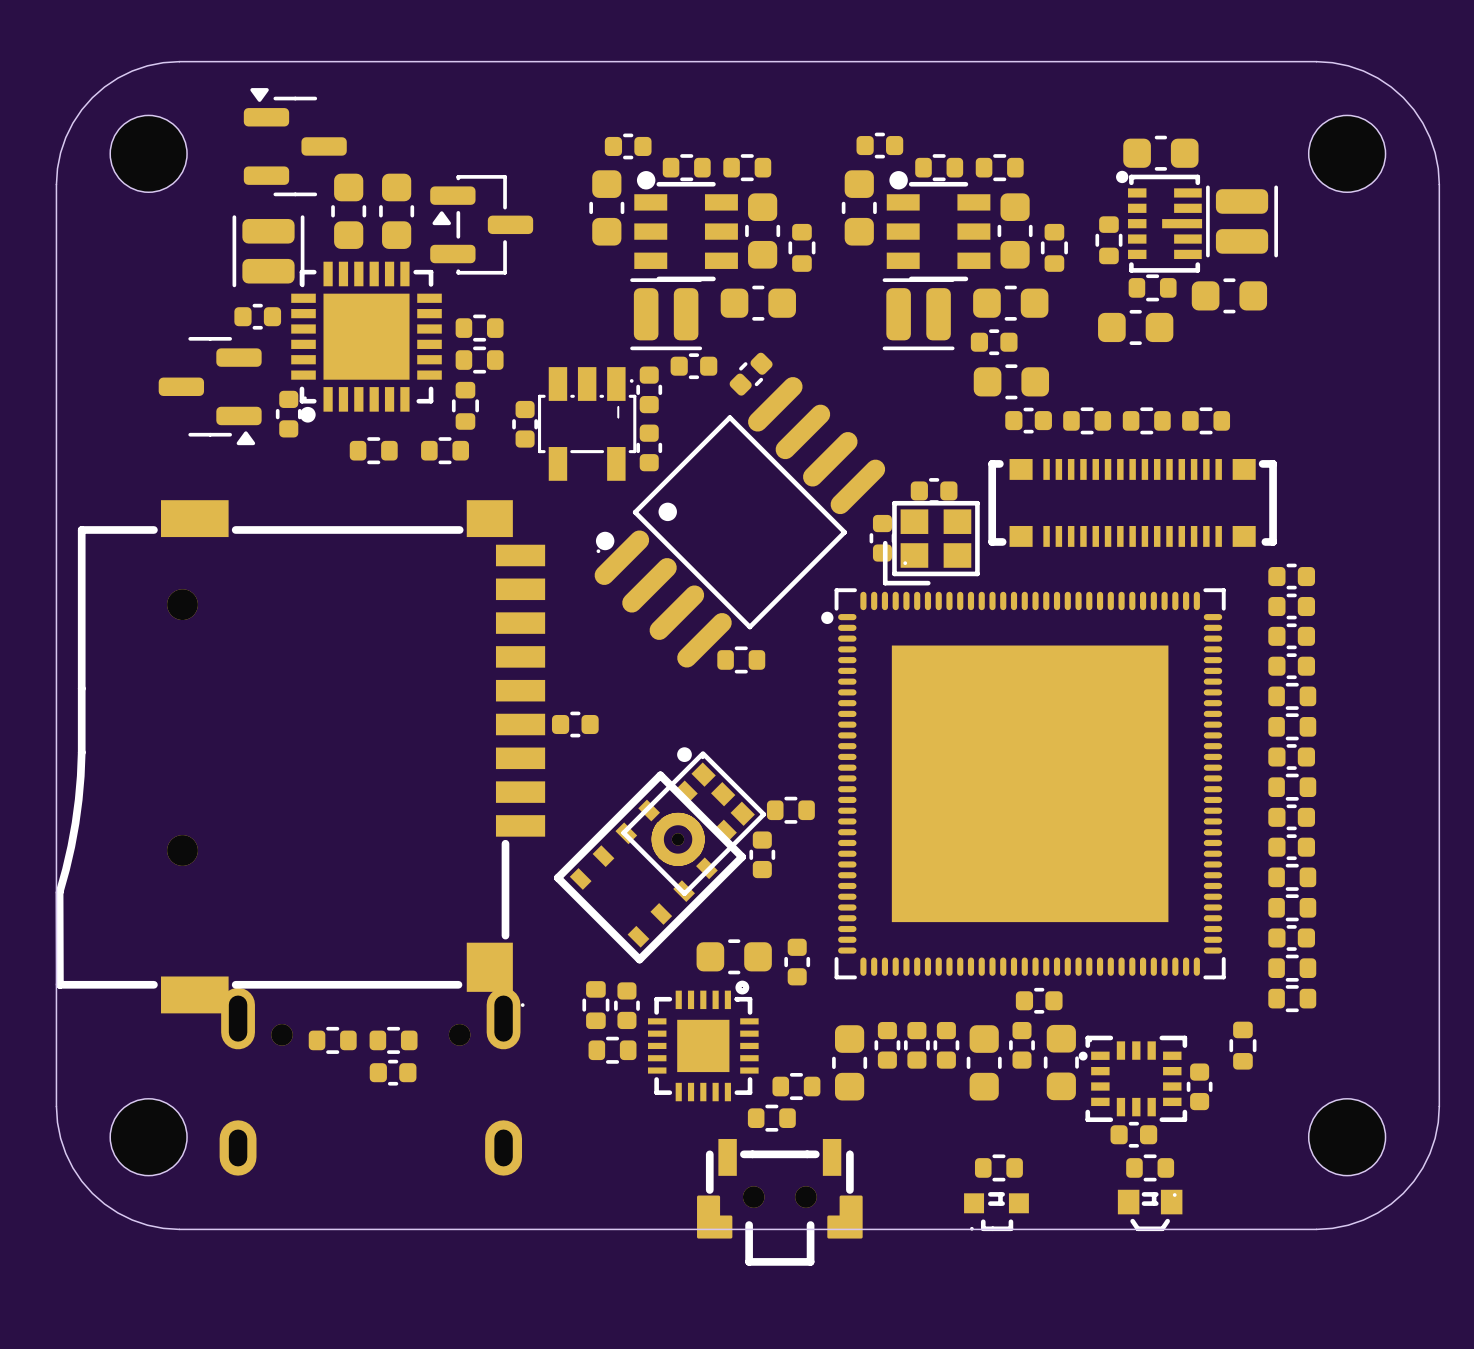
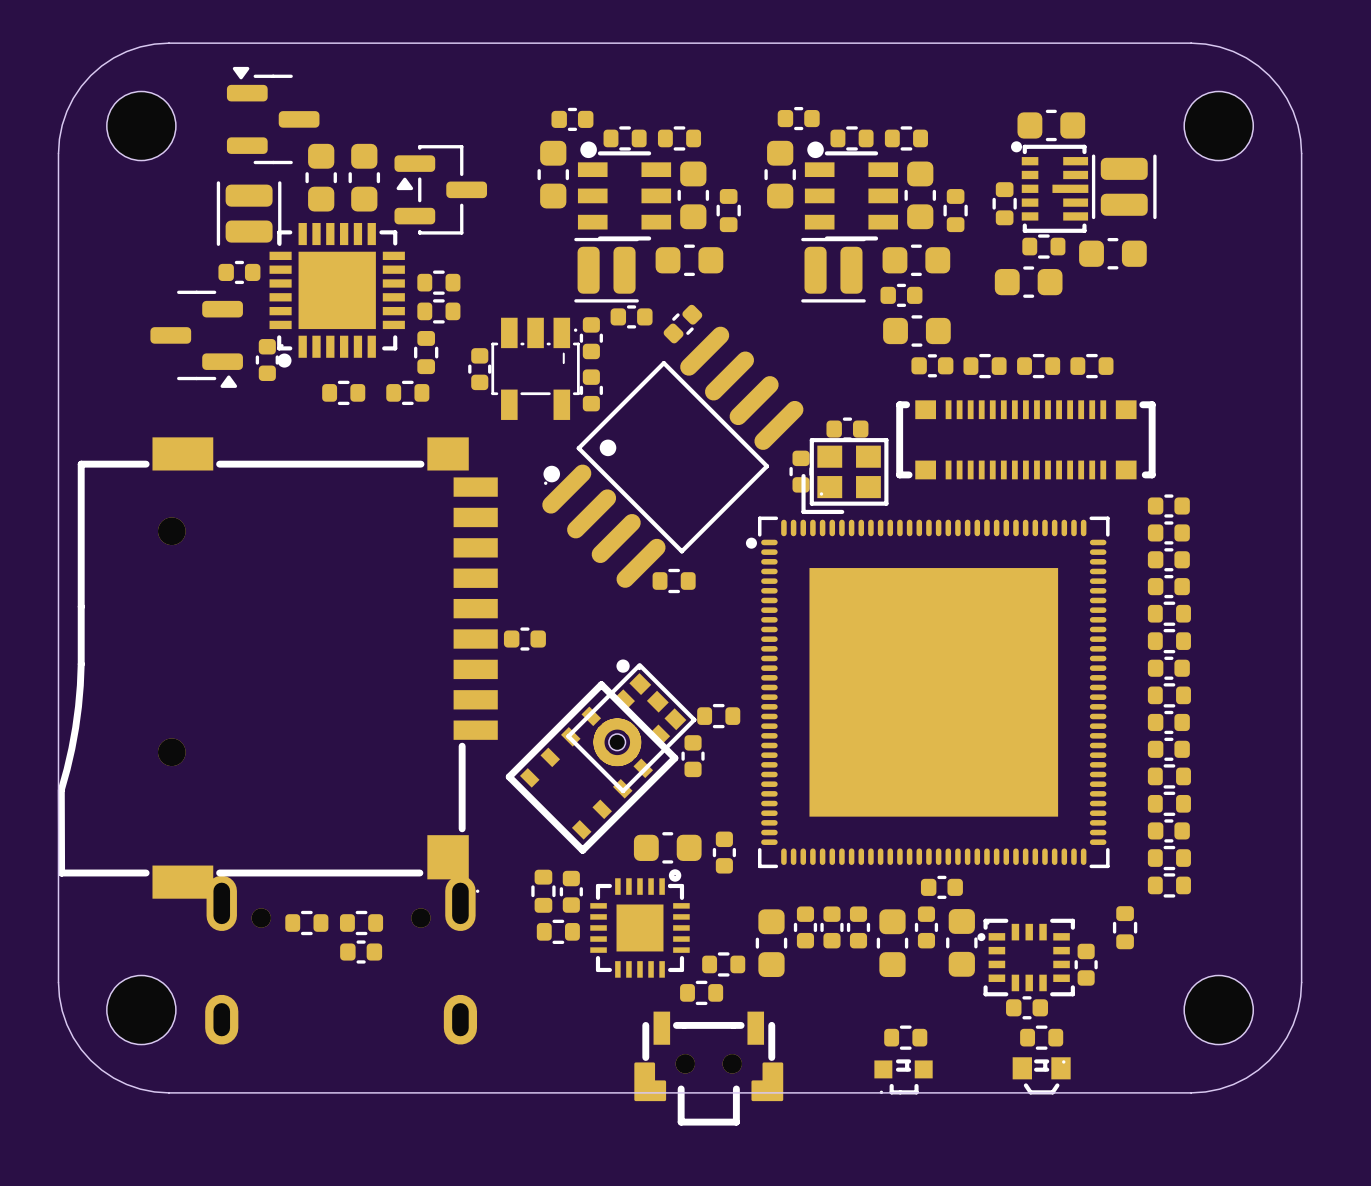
part footprint: [621, 747, 767, 897] -> [566, 659, 697, 794]
part footprint: [554, 771, 746, 964] -> [505, 681, 679, 854]

